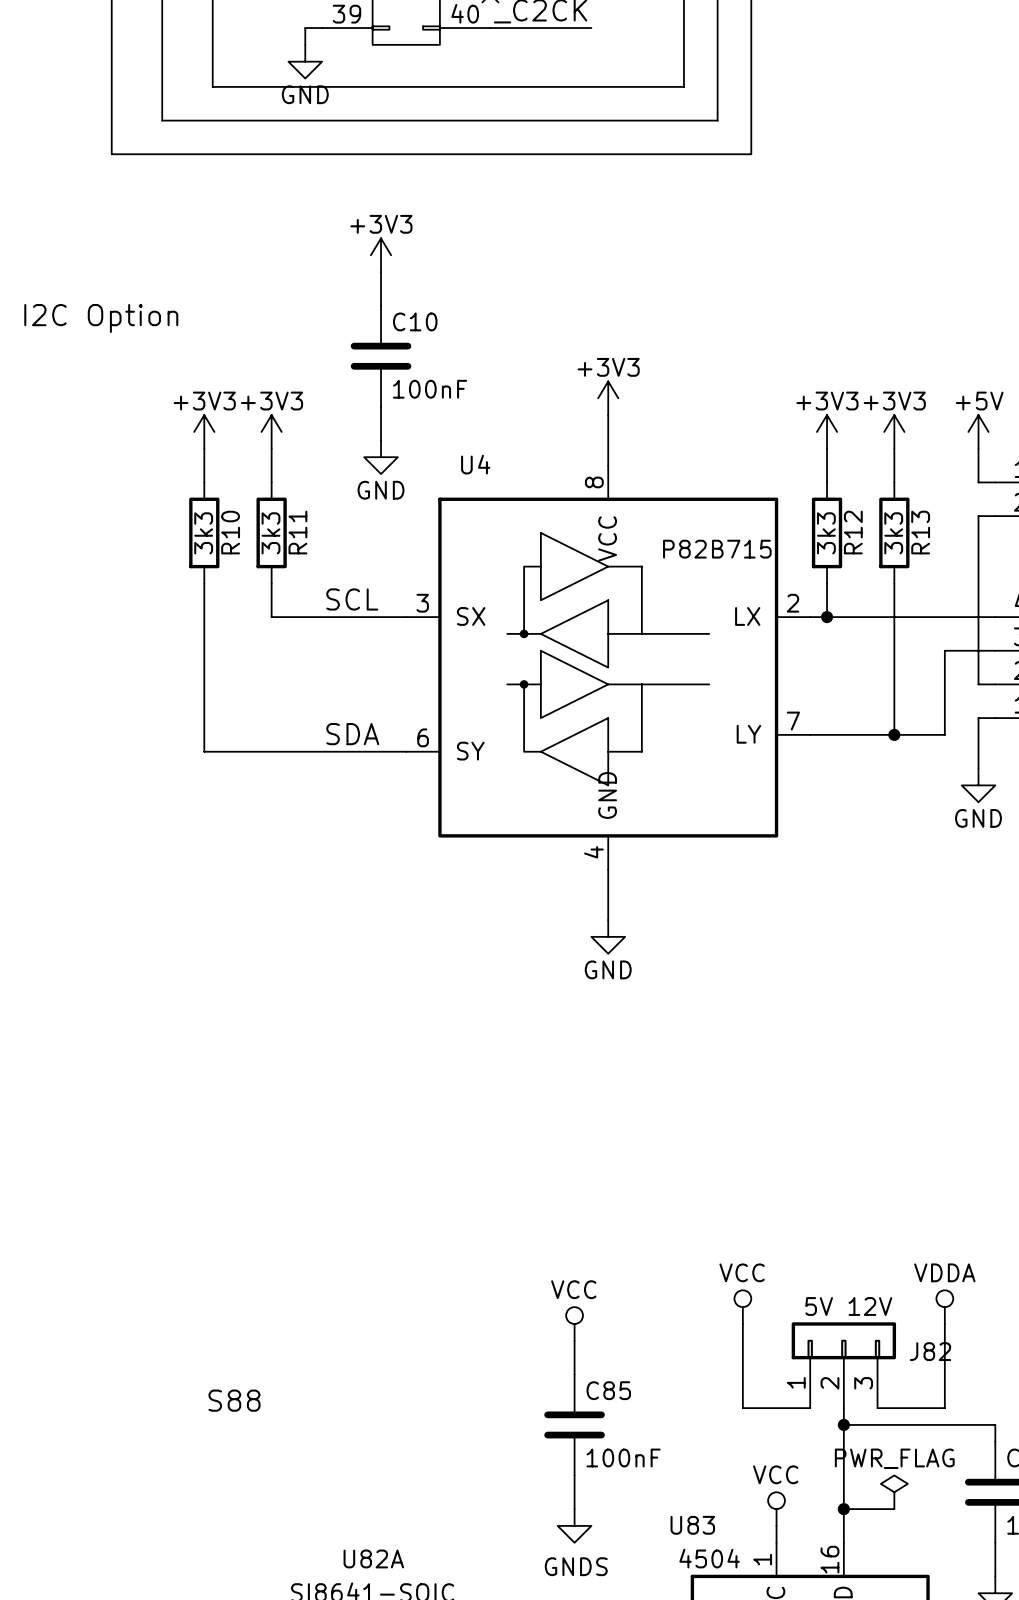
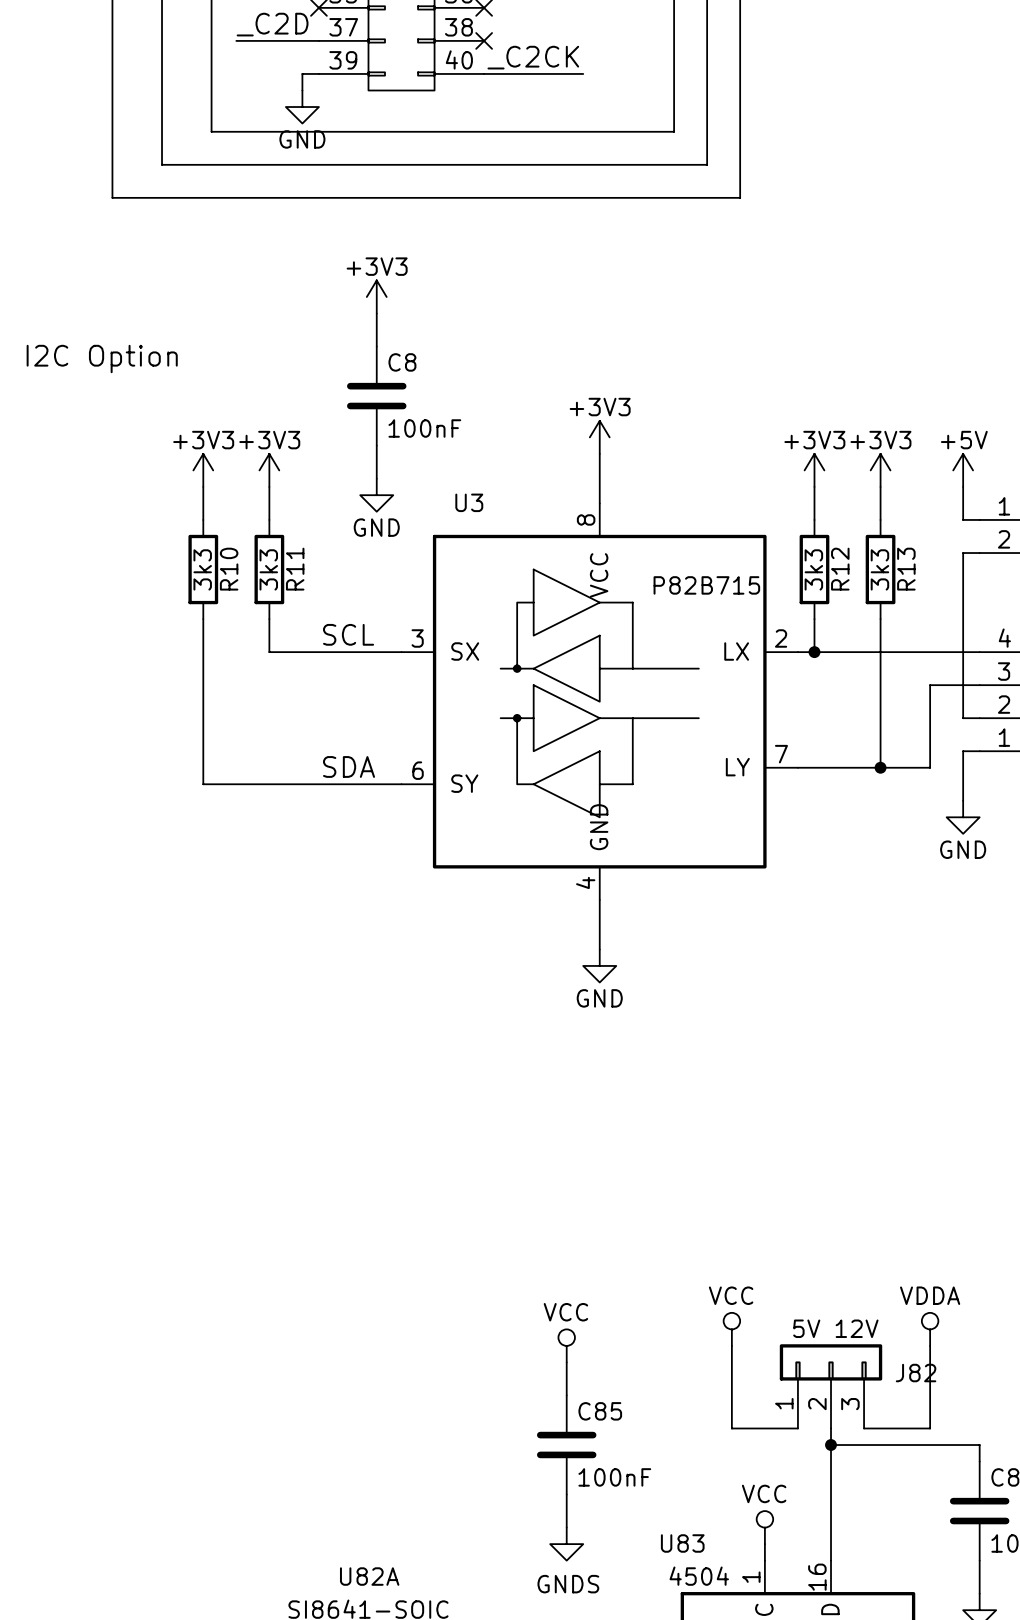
C10 name: C10 (415, 321) -> C8 (402, 362)
U4 name: U4 (475, 464) -> U3 (469, 502)
text: S88 (234, 1400) -> none
power symbol: PWR_FLAG (894, 1492) -> none
wire: (843, 1509) (894, 1509) -> none
junction: (843, 1509) -> none

